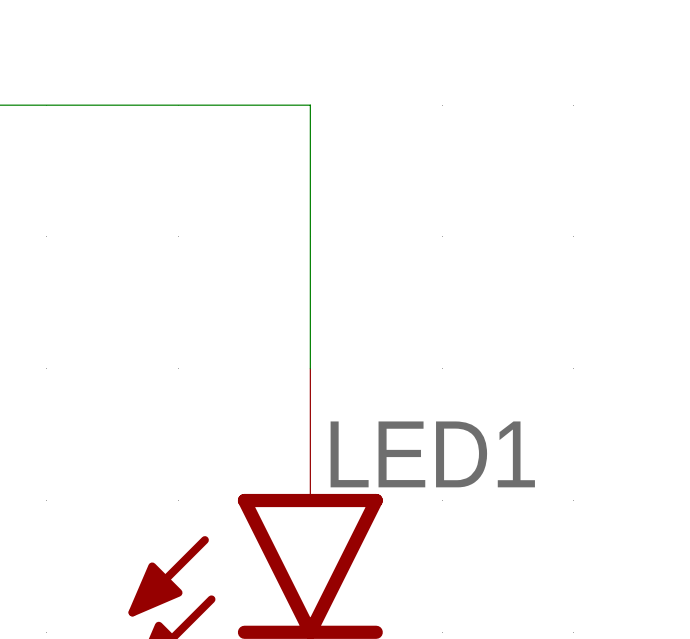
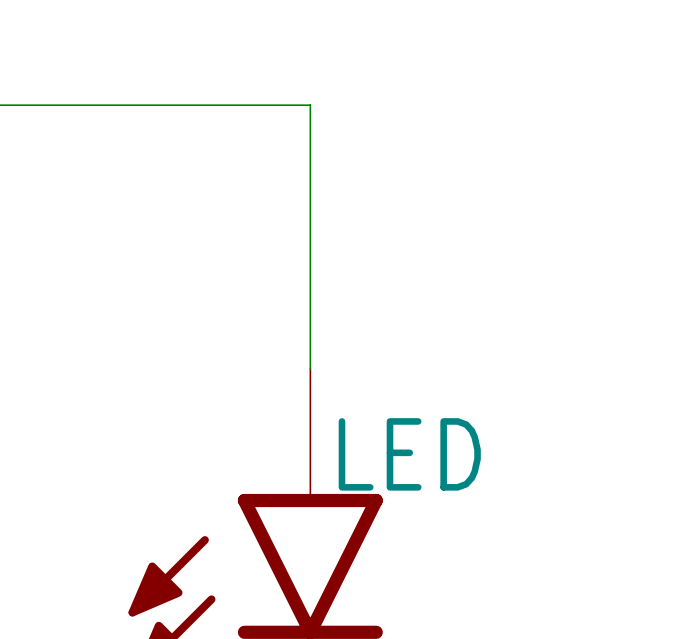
LED1 name: LED1 (432, 454) -> LED (409, 454)

